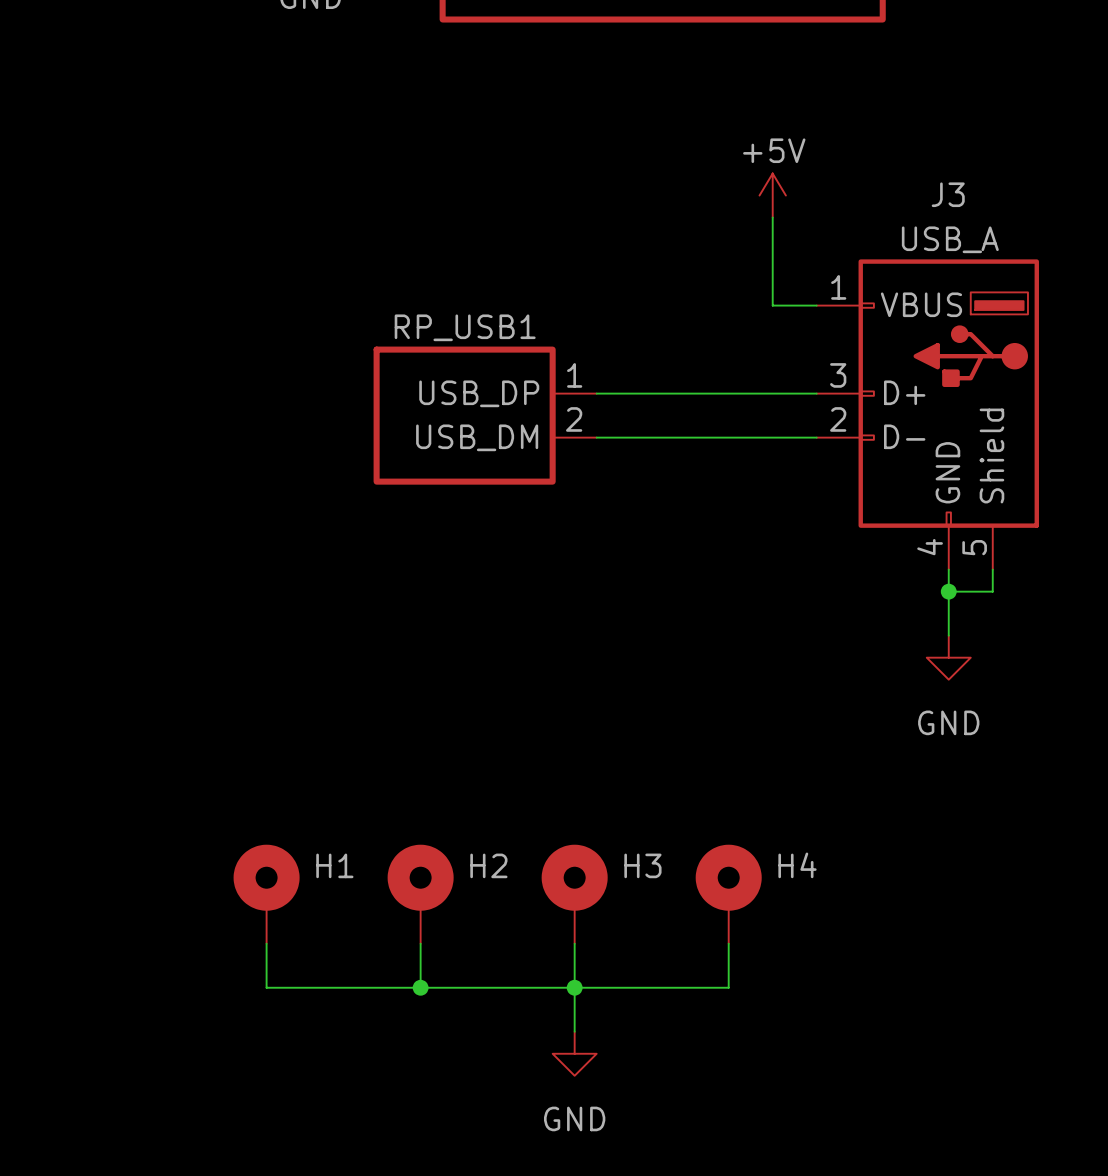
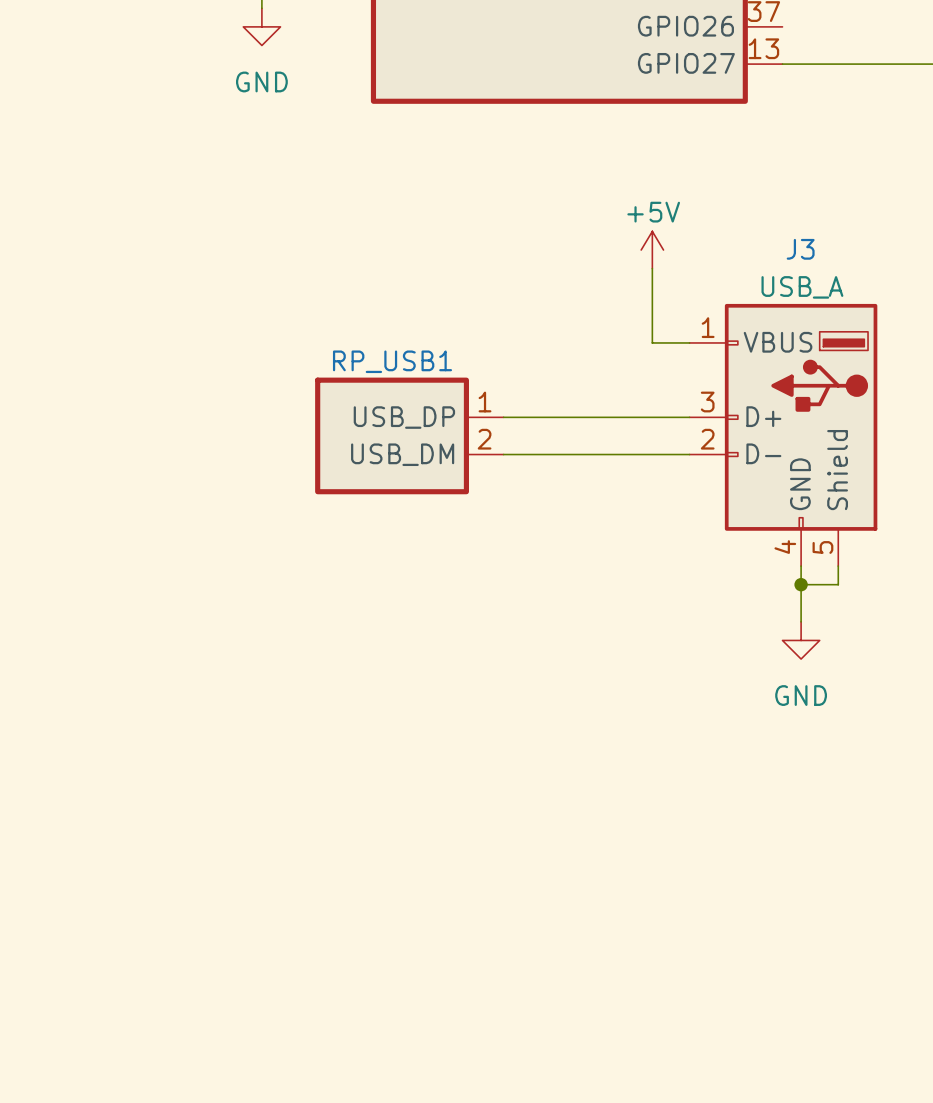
H1: (266, 894) -> none
H2: (420, 894) -> none
H3: (574, 894) -> none
H4: (728, 894) -> none
wire: (266, 943) (266, 987) (728, 987) (728, 943) -> none
wire: (420, 943) (420, 987) -> none
wire: (574, 943) (574, 1031) -> none
junction: (420, 987) -> none
junction: (574, 987) -> none
power symbol: GND (574, 1053) -> none

